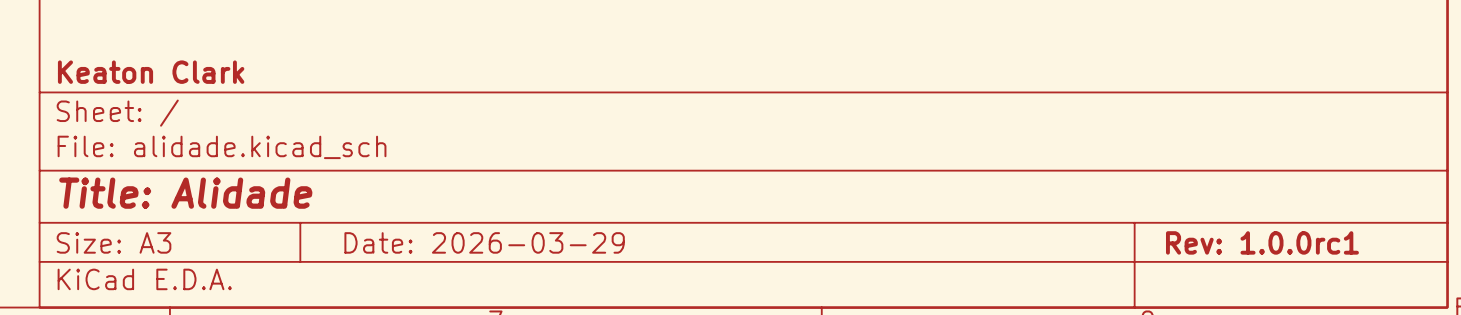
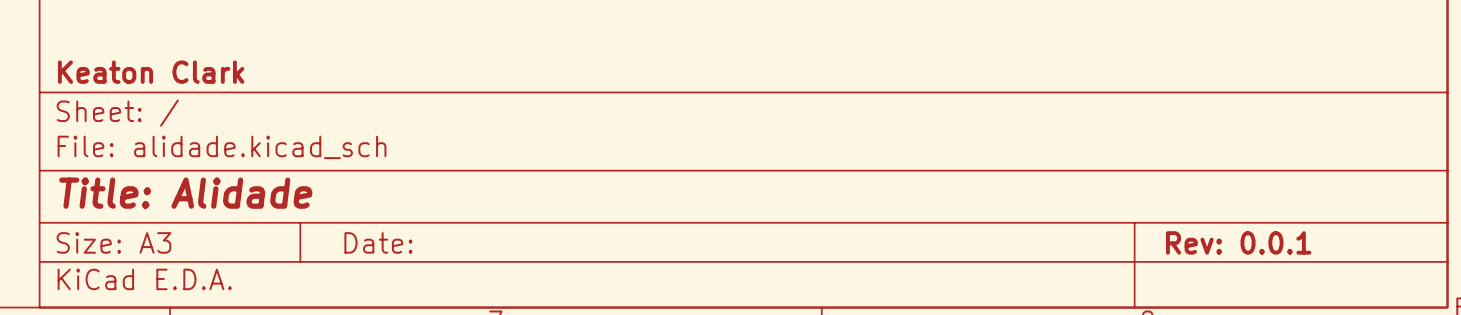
title block: Date: 2026-03-29 (484, 242) -> Date: (378, 242)
title block: Rev: 1.0.0rc1 (1262, 242) -> Rev: 0.0.1 (1238, 242)

